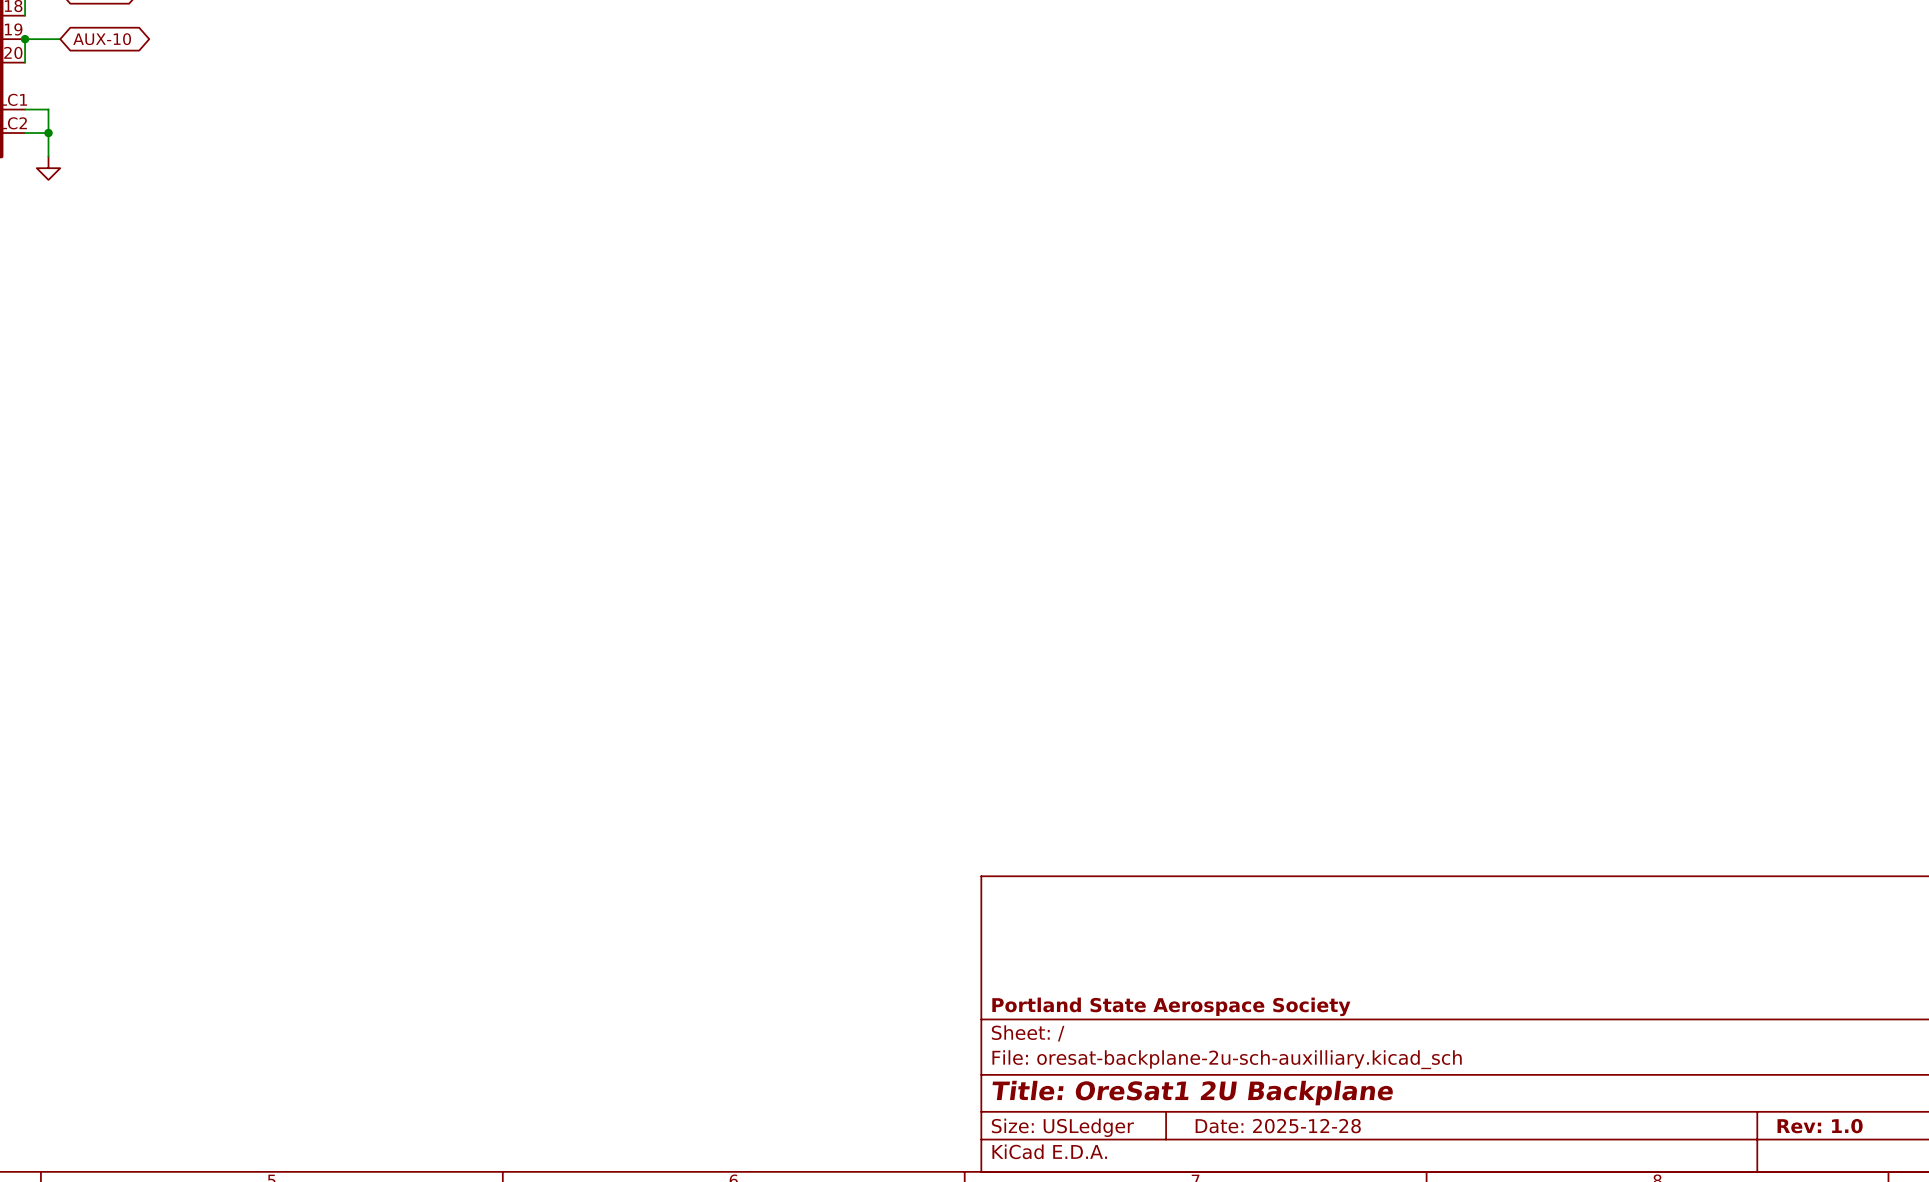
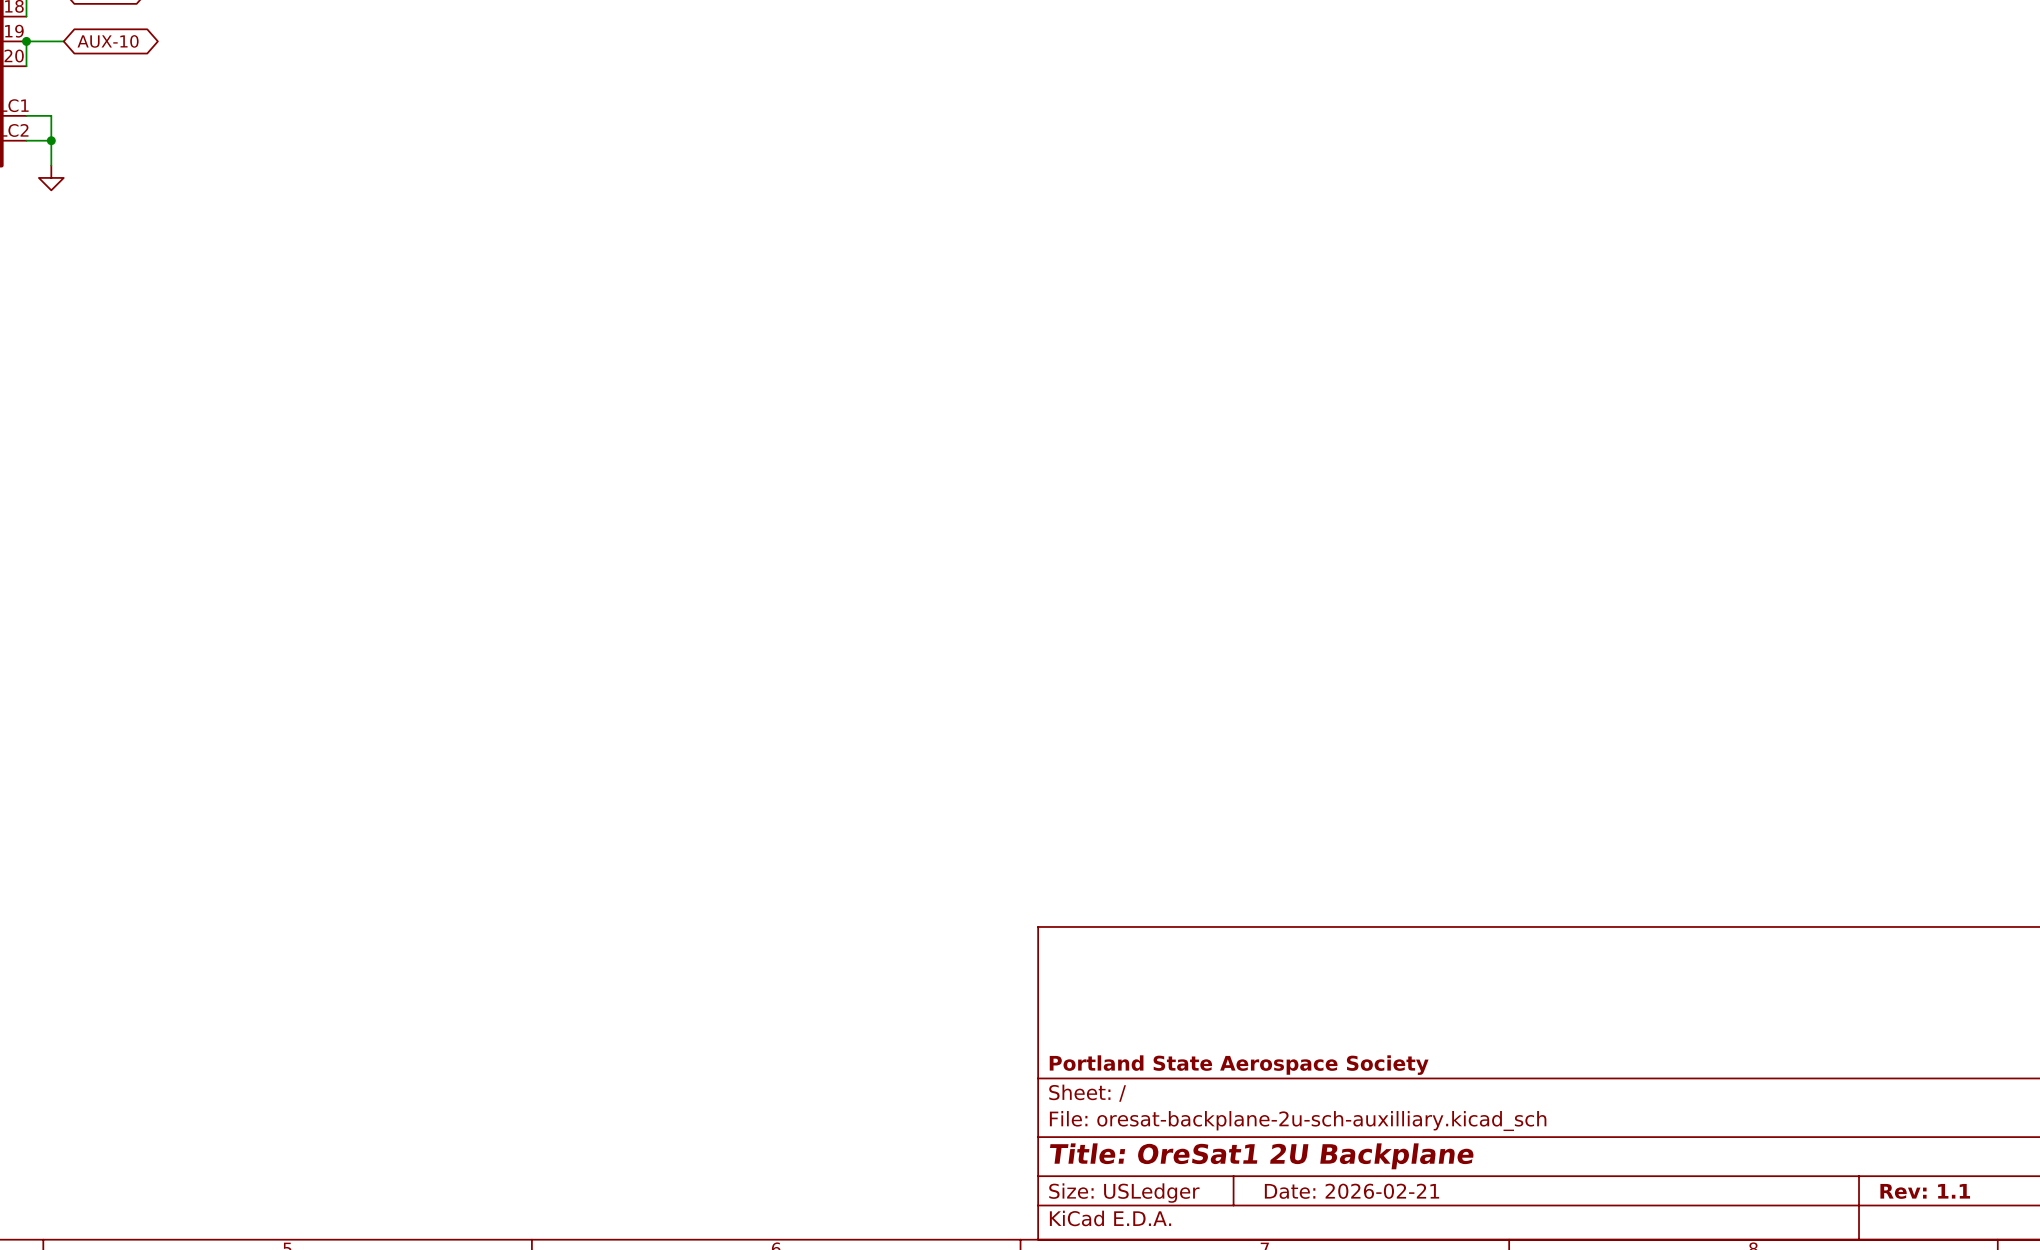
title block: Date: 2025-12-28 (1278, 1126) -> Date: 2026-02-21 (1351, 1191)
title block: Rev: 1.0 (1820, 1126) -> Rev: 1.1 (1925, 1191)

